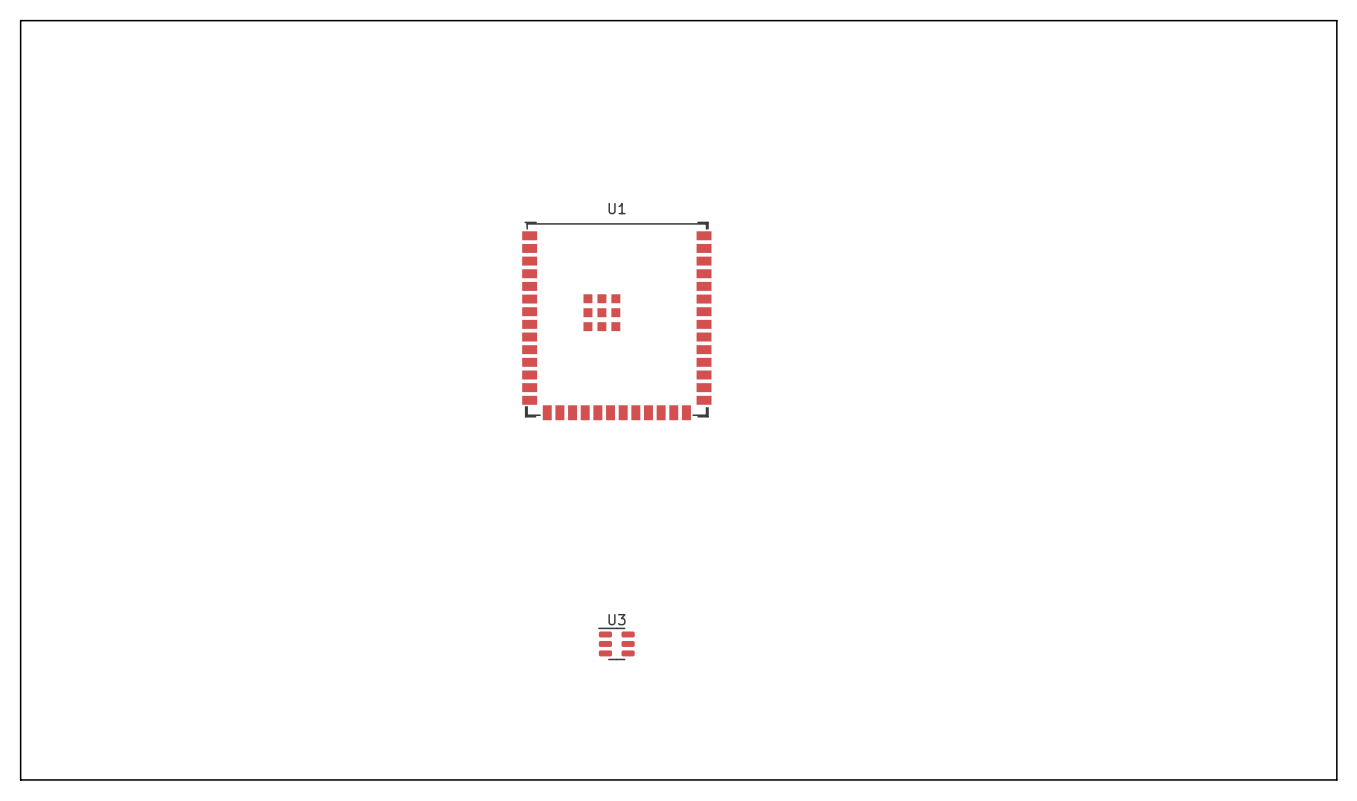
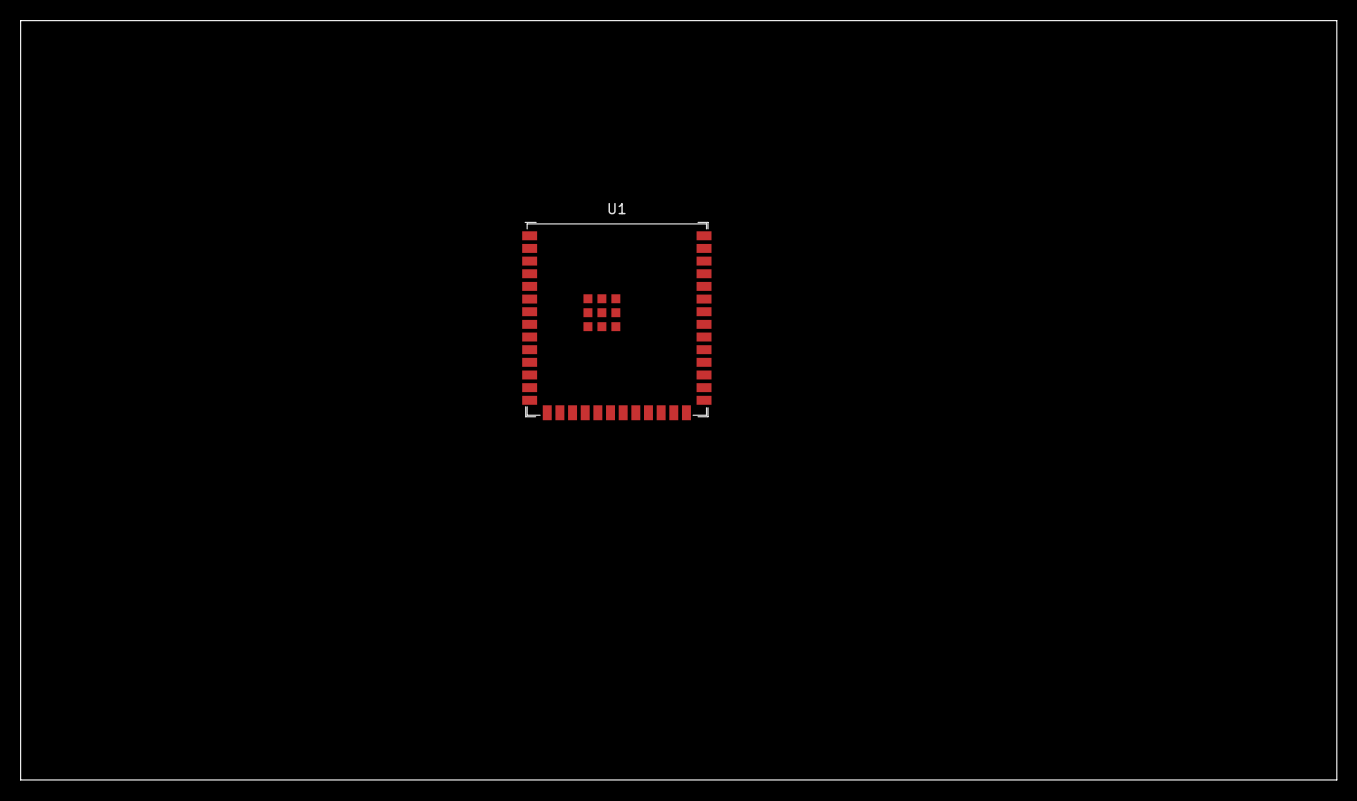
U3: (616, 643) -> none

